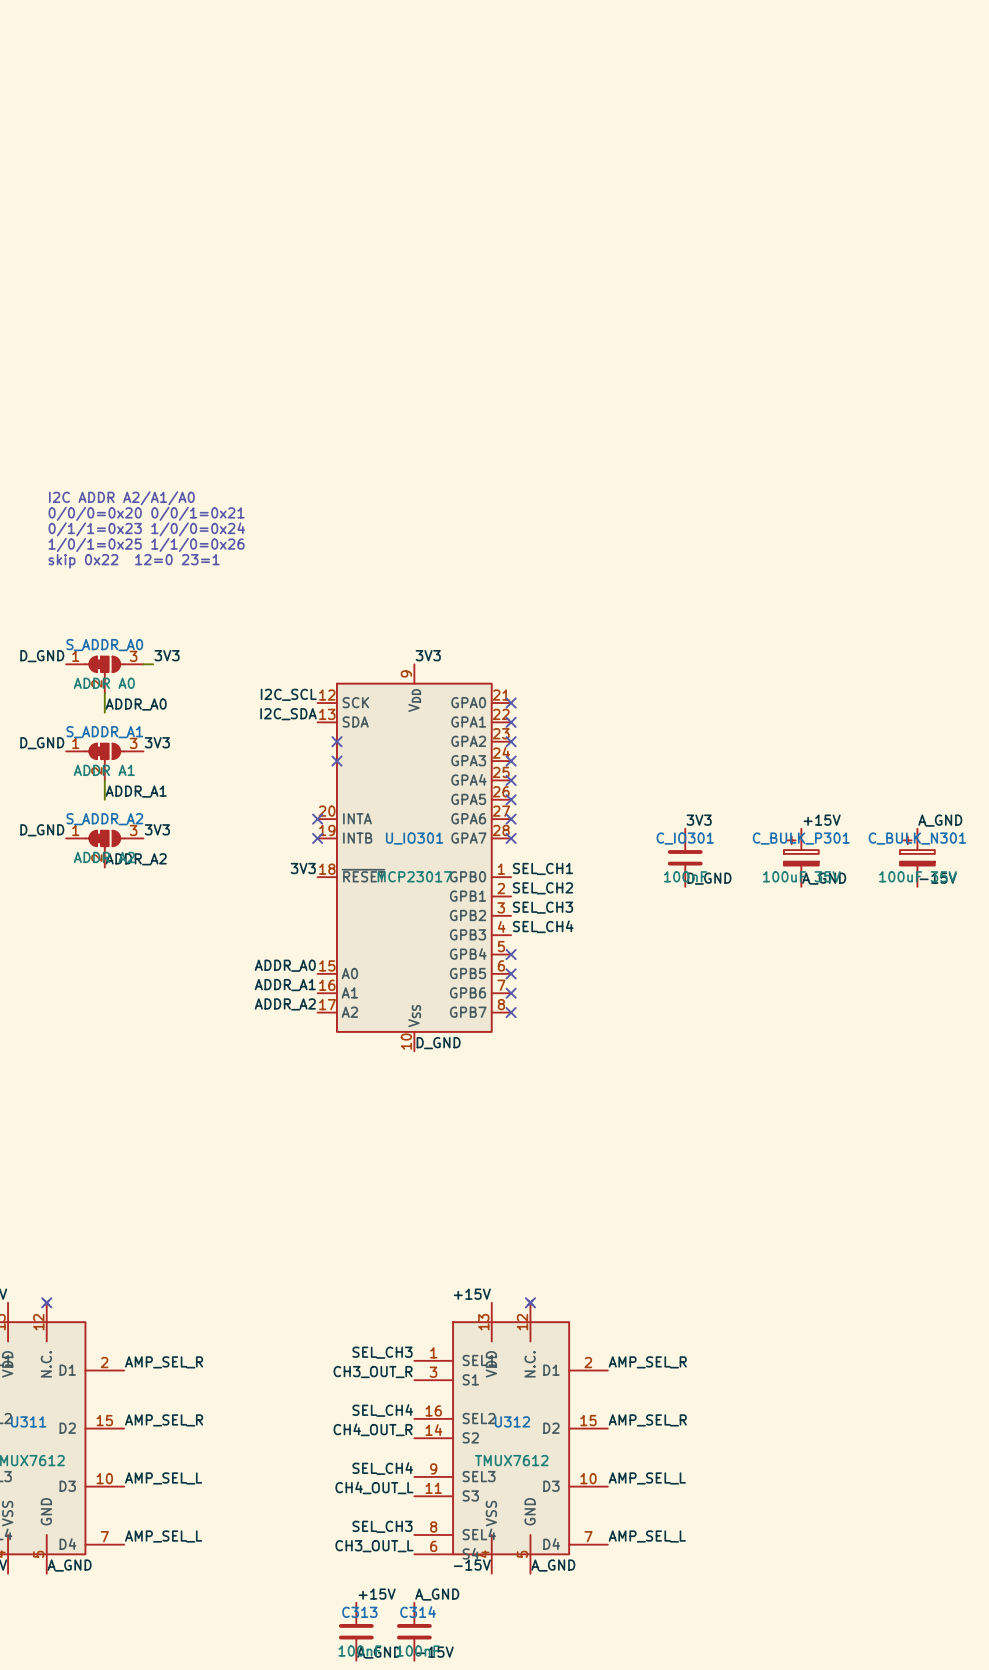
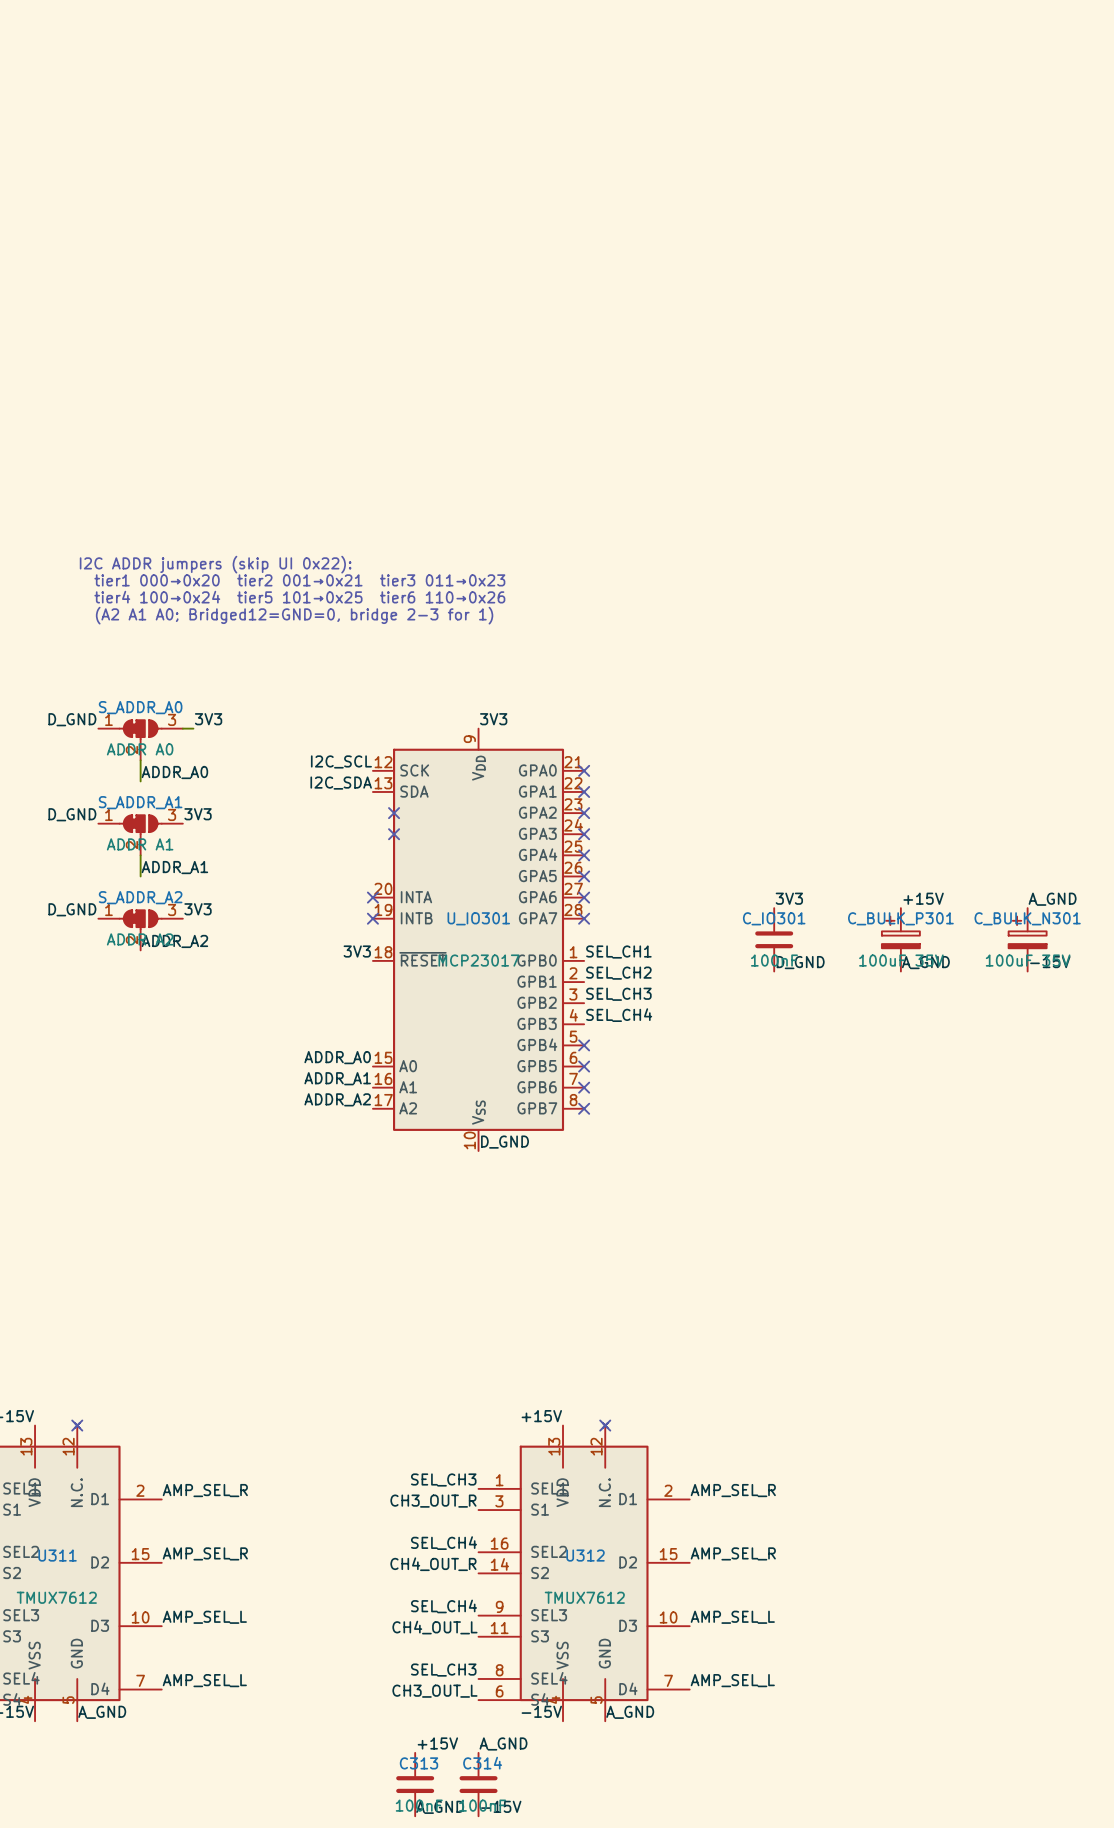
text: I2C ADDR A2/A1/A0 (121, 498) -> none
text: 0/0/0=0x20 0/0/1=0x21 (146, 513) -> I2C ADDR jumpers (skip UI 0x22): (215, 564)
text: 0/1/1=0x23 1/0/0=0x24 (146, 529) -> tier1 000→0x20 tier2 001→0x21 tier3 011→0x23 (299, 580)
text: 1/0/1=0x25 1/1/0=0x26 (146, 544) -> tier4 100→0x24 tier5 101→0x25 tier6 110→0x26 (299, 597)
text: skip 0x22 12=0 23=1 (134, 561) -> (A2 A1 A0; Bridged12=GND=0, bridge 2-3 for 1) (294, 615)

